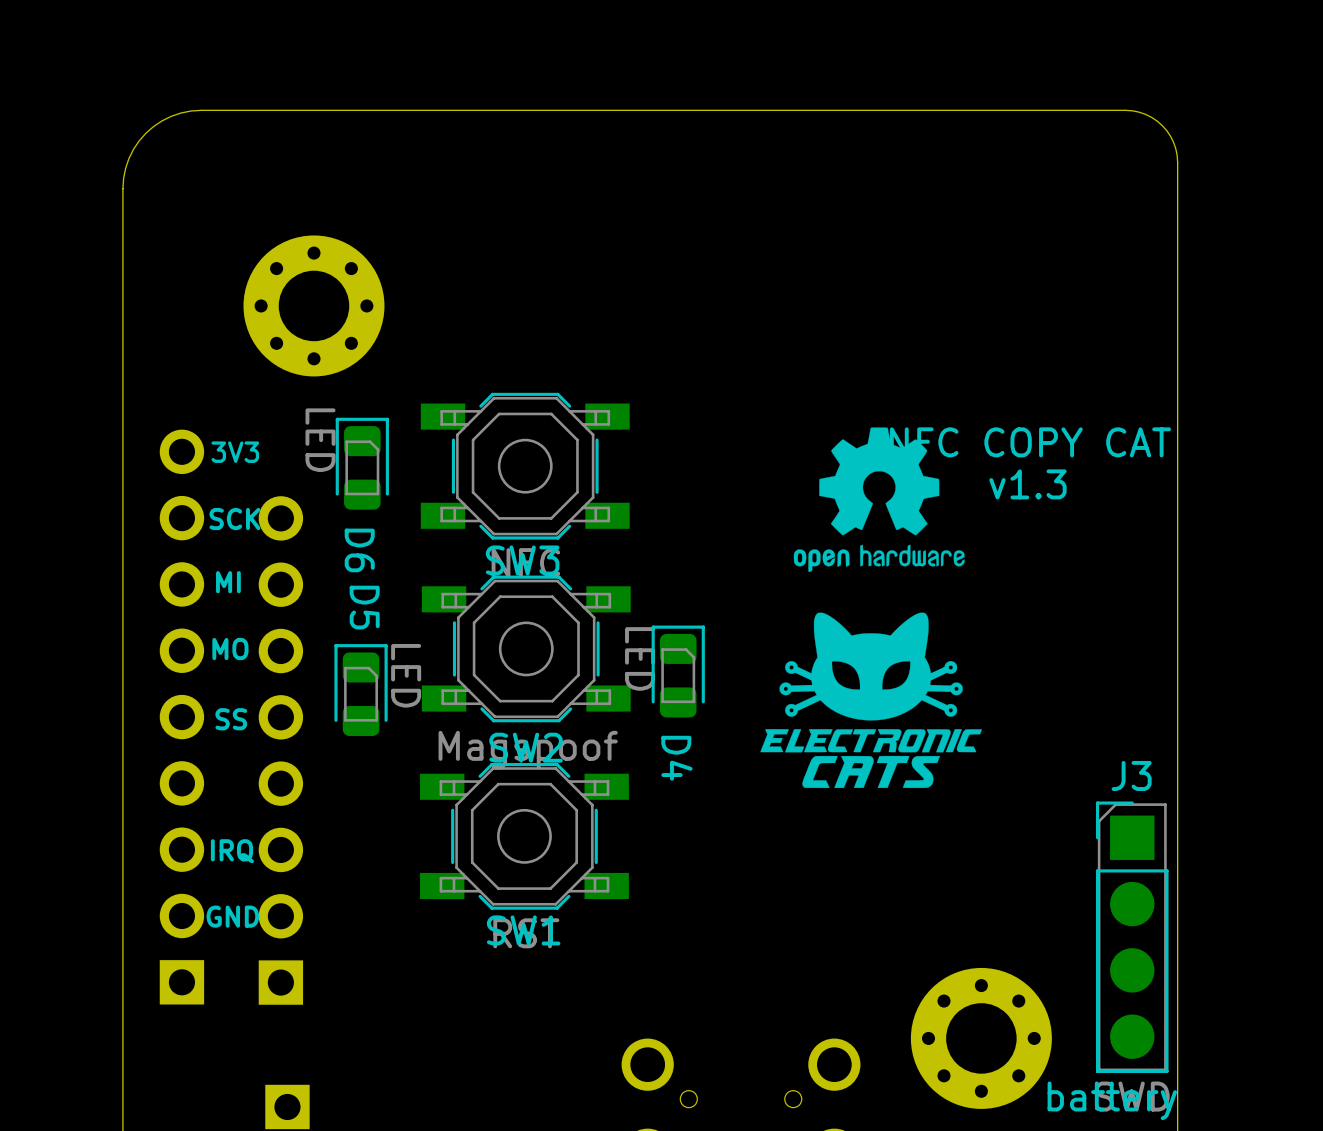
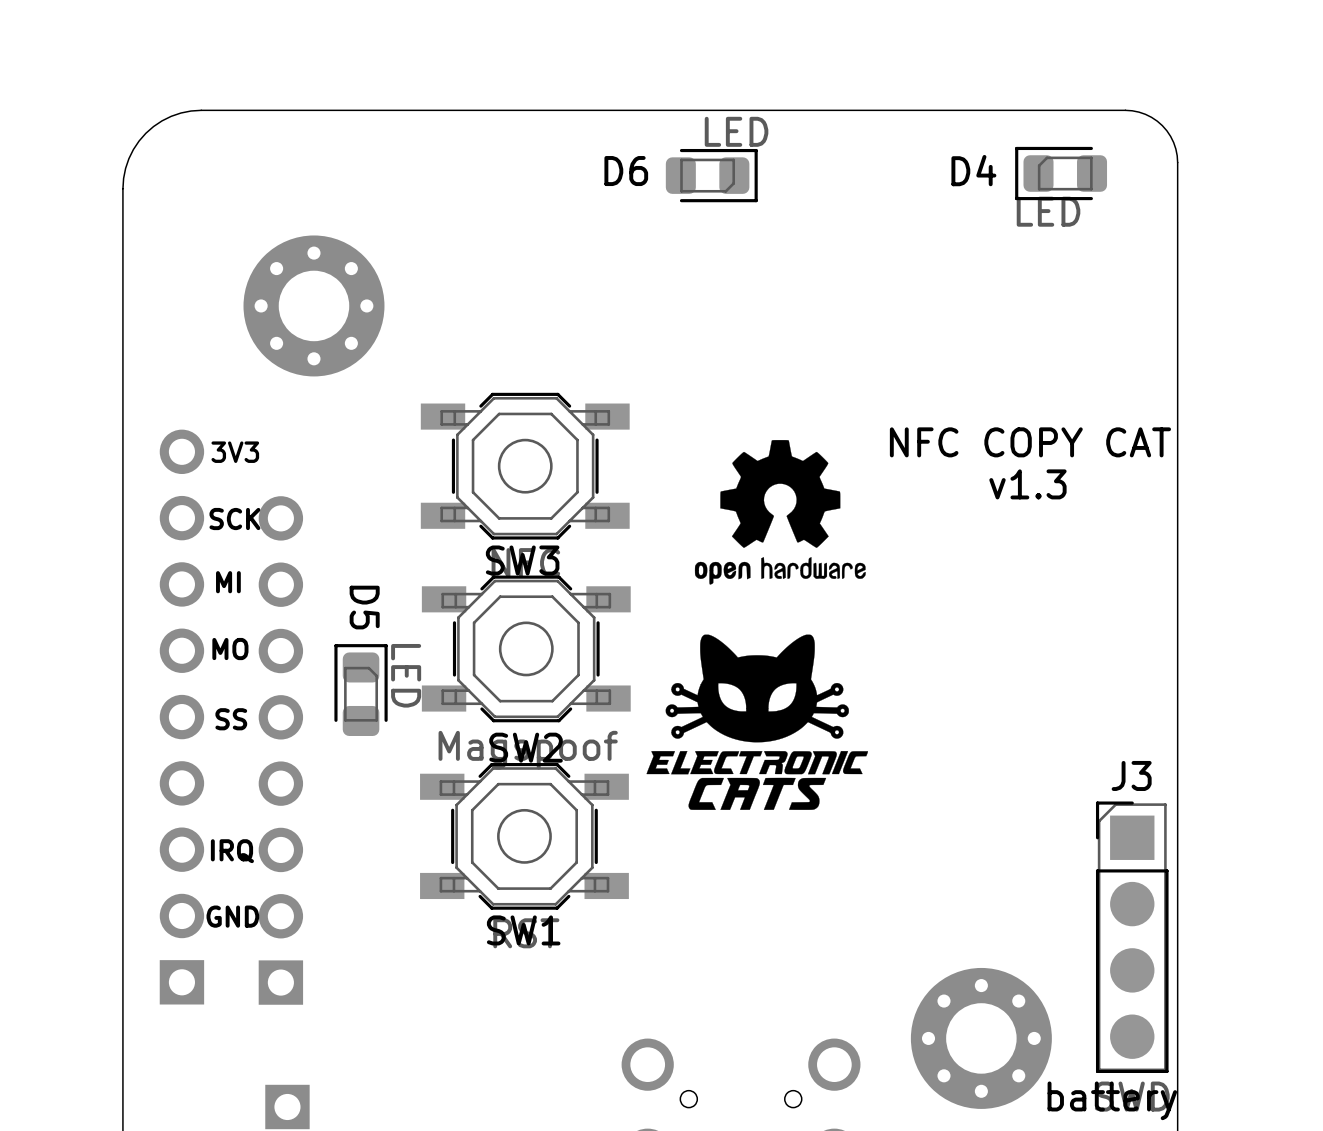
D6 rotation: 0° (362, 463) -> 90° clockwise (711, 175)
D6 position: (362, 463) -> (711, 175)
drawing position: (879, 499) -> (780, 512)
D4 rotation: 0° (678, 671) -> 90° counterclockwise (1061, 173)
D4 position: (678, 671) -> (1061, 173)
drawing position: (871, 700) -> (757, 722)
D4 name position: D4 (676, 758) -> D4 (973, 170)

